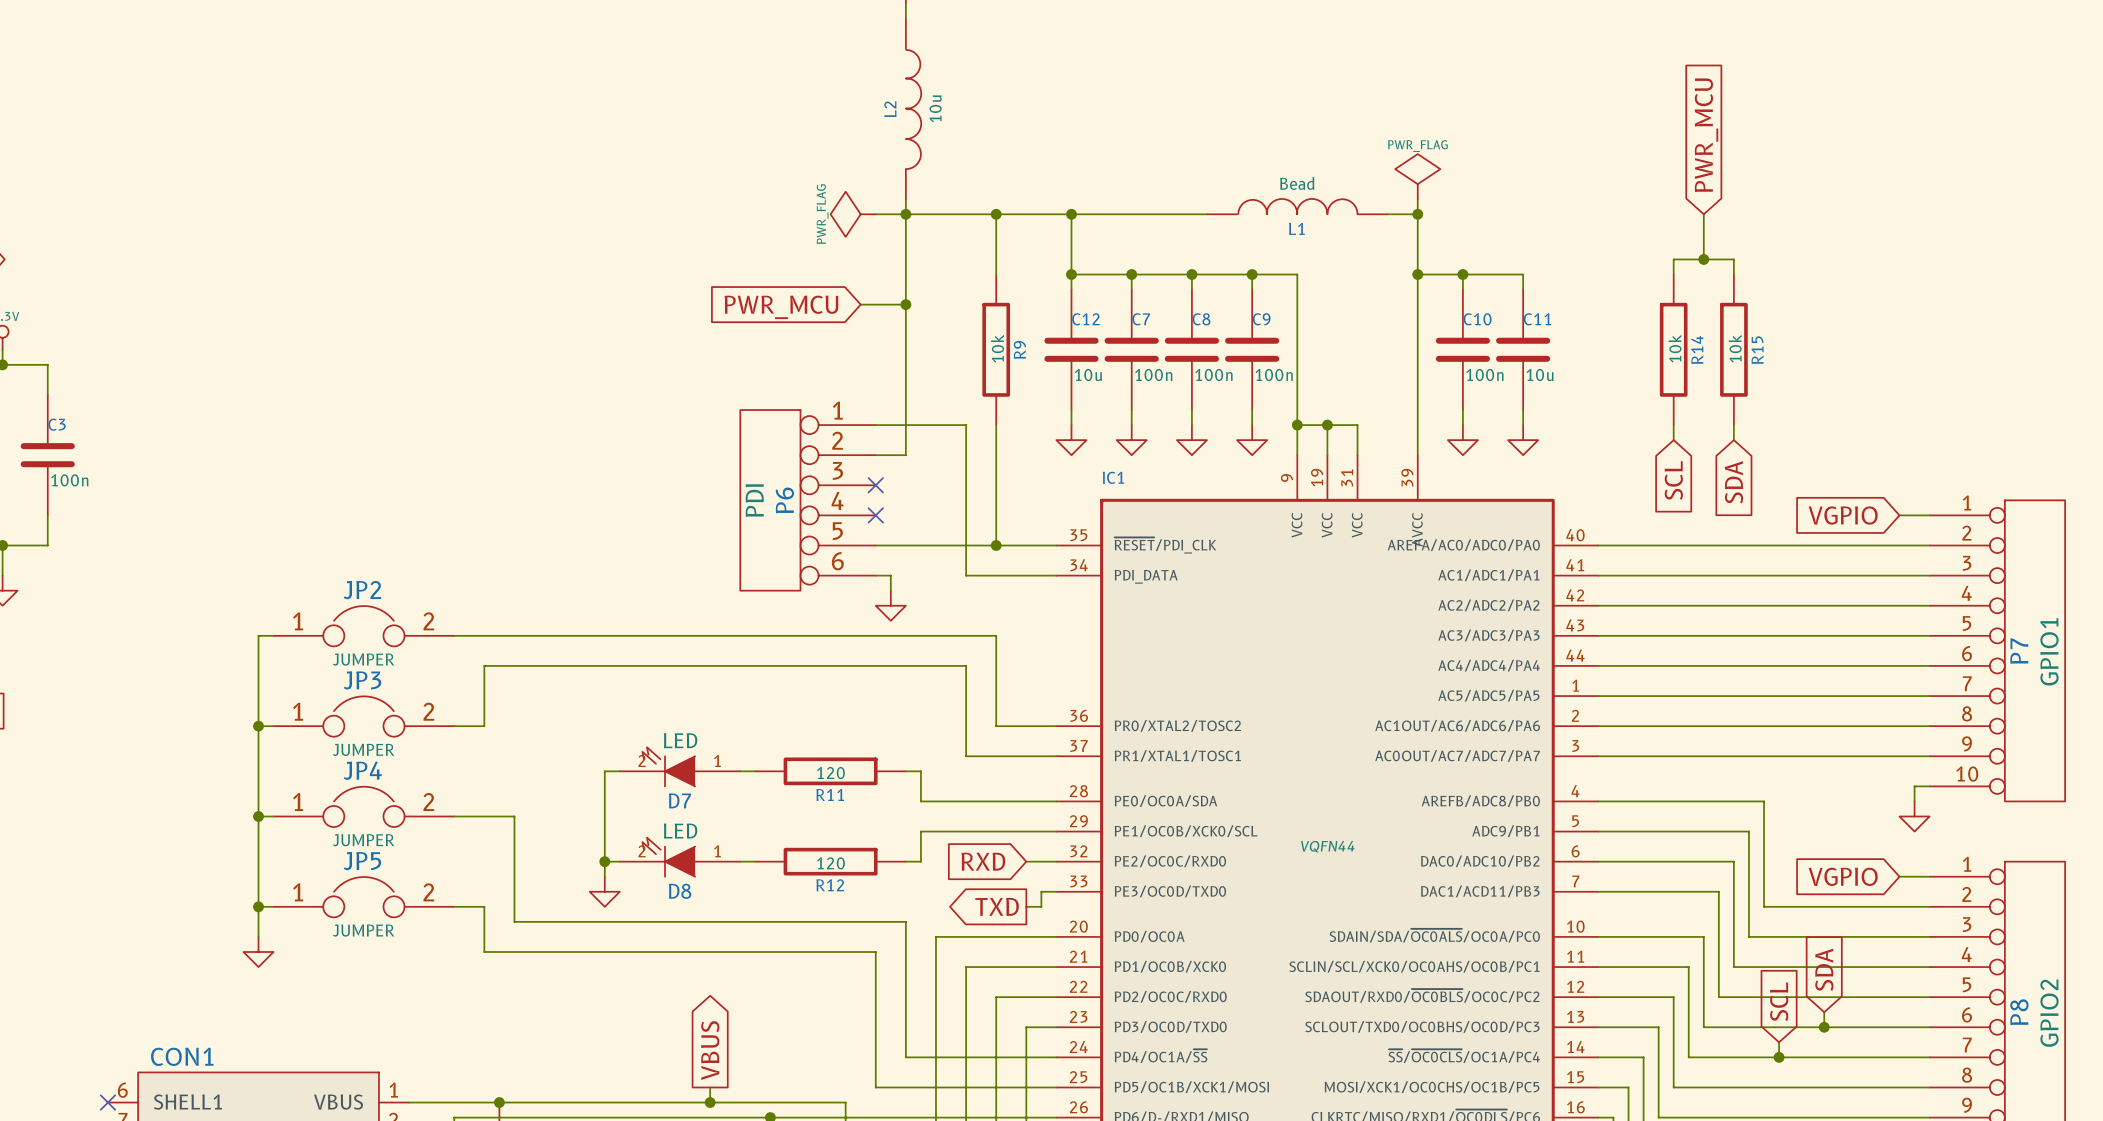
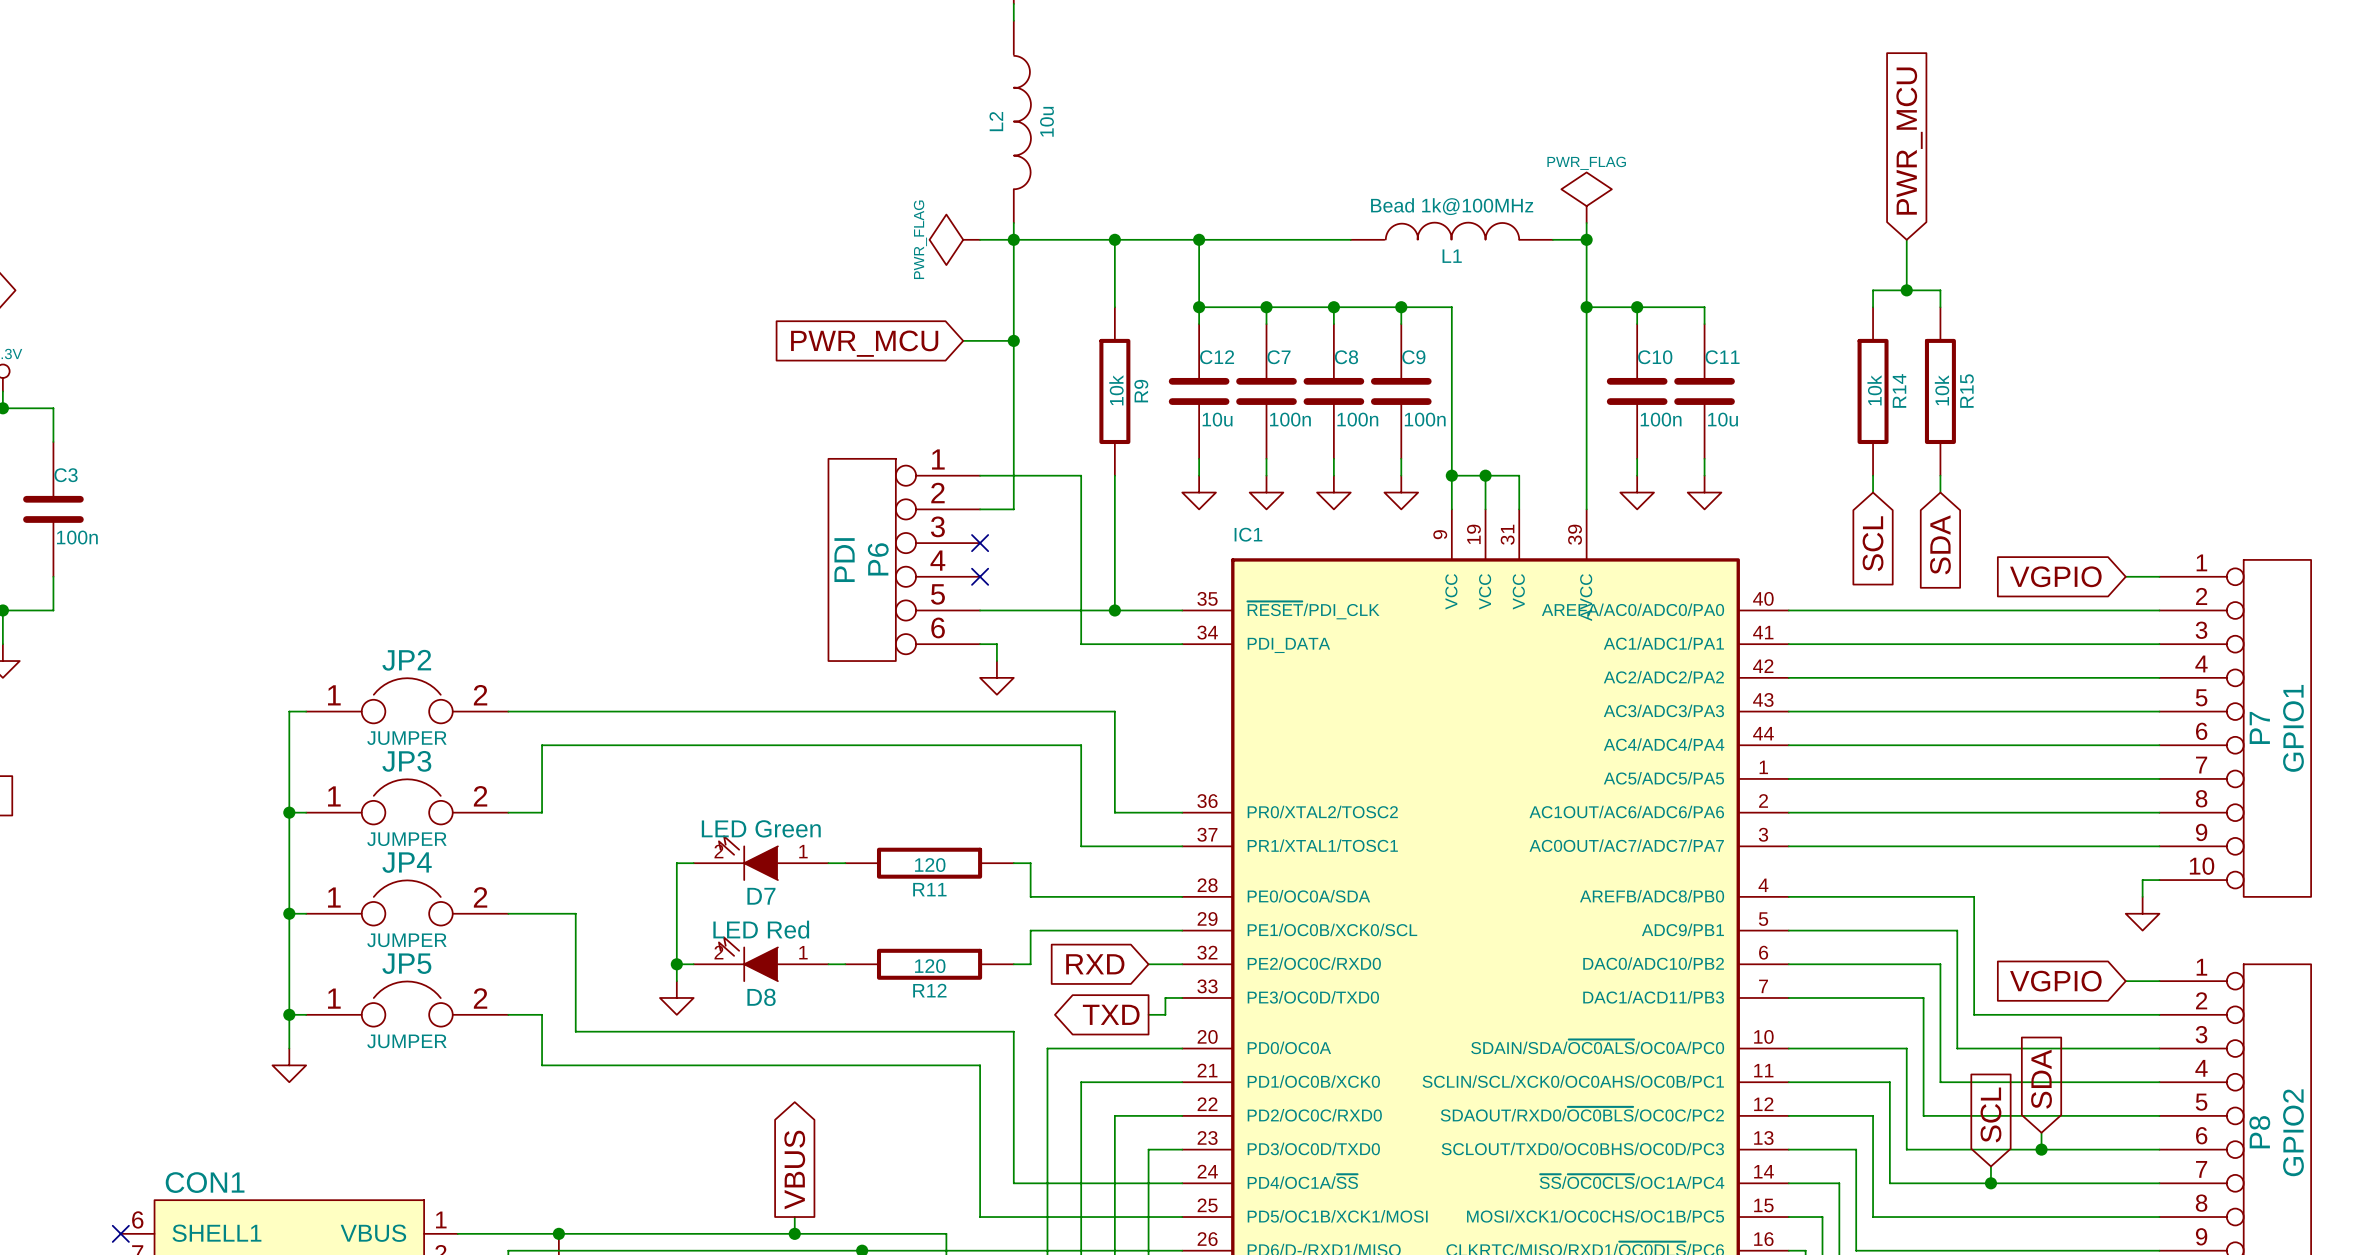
L1 value: Bead (1297, 183) -> Bead 1k@100MHz (1452, 206)
D7 value: LED (680, 740) -> LED Green (761, 828)
D8 value: LED (680, 830) -> LED Red (761, 929)
IC1 text: VQFN44 (1327, 846) -> none

